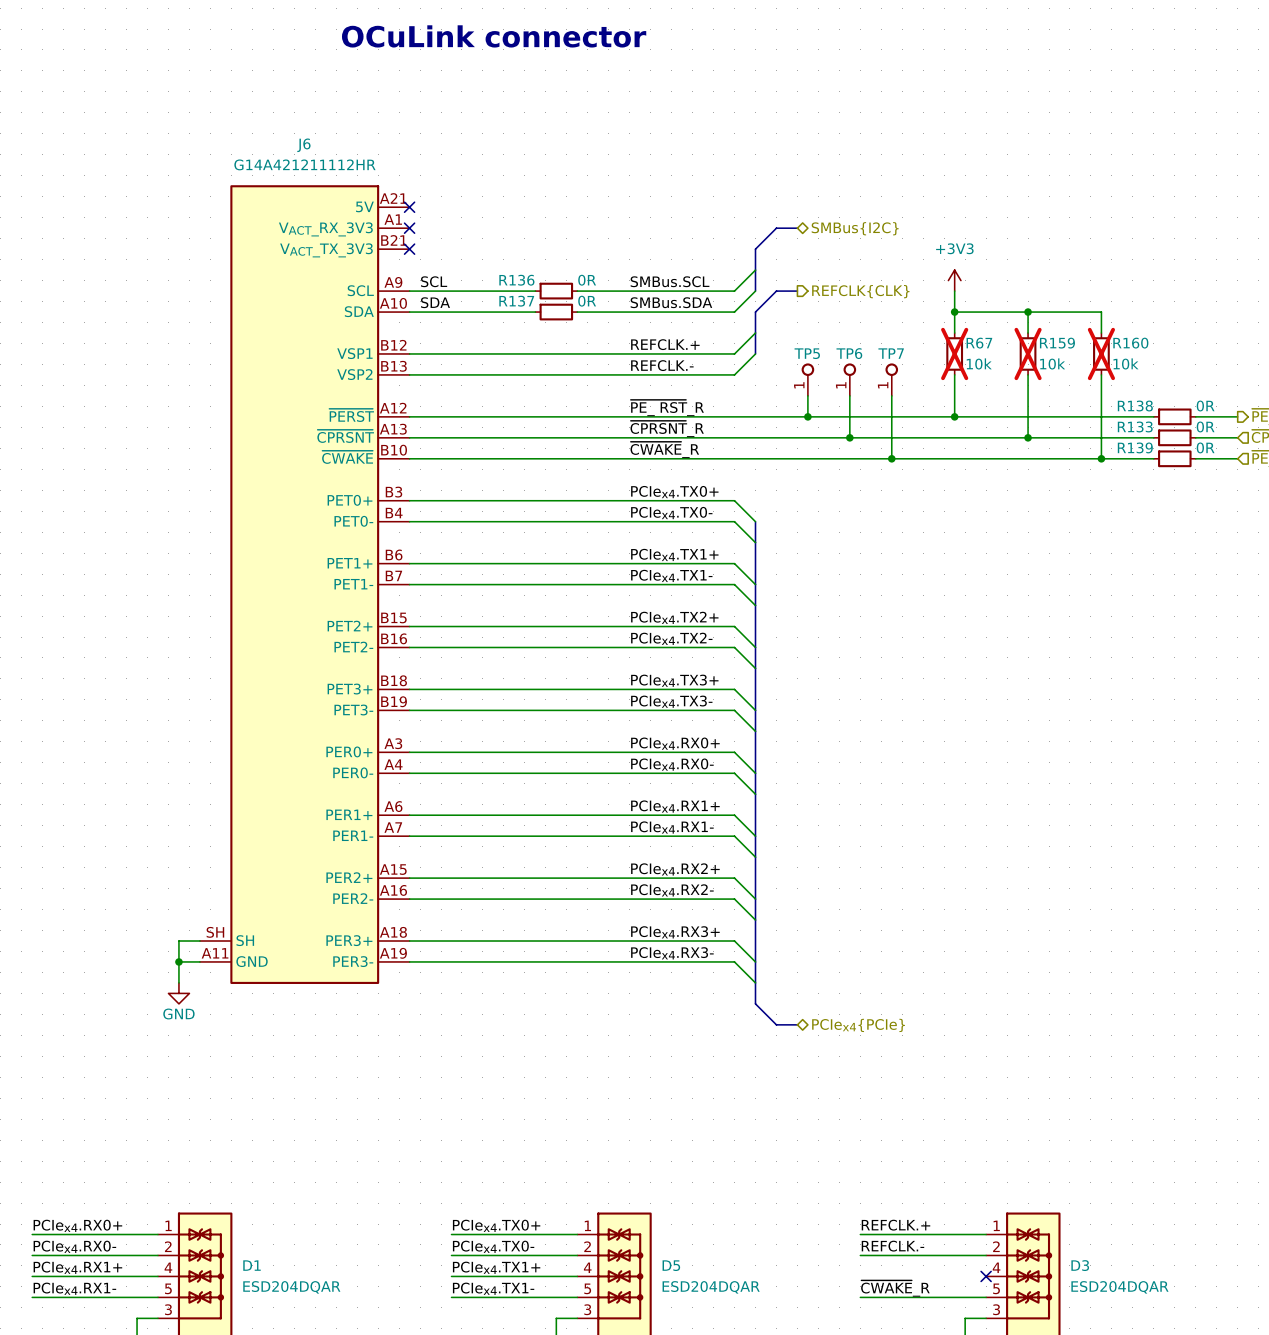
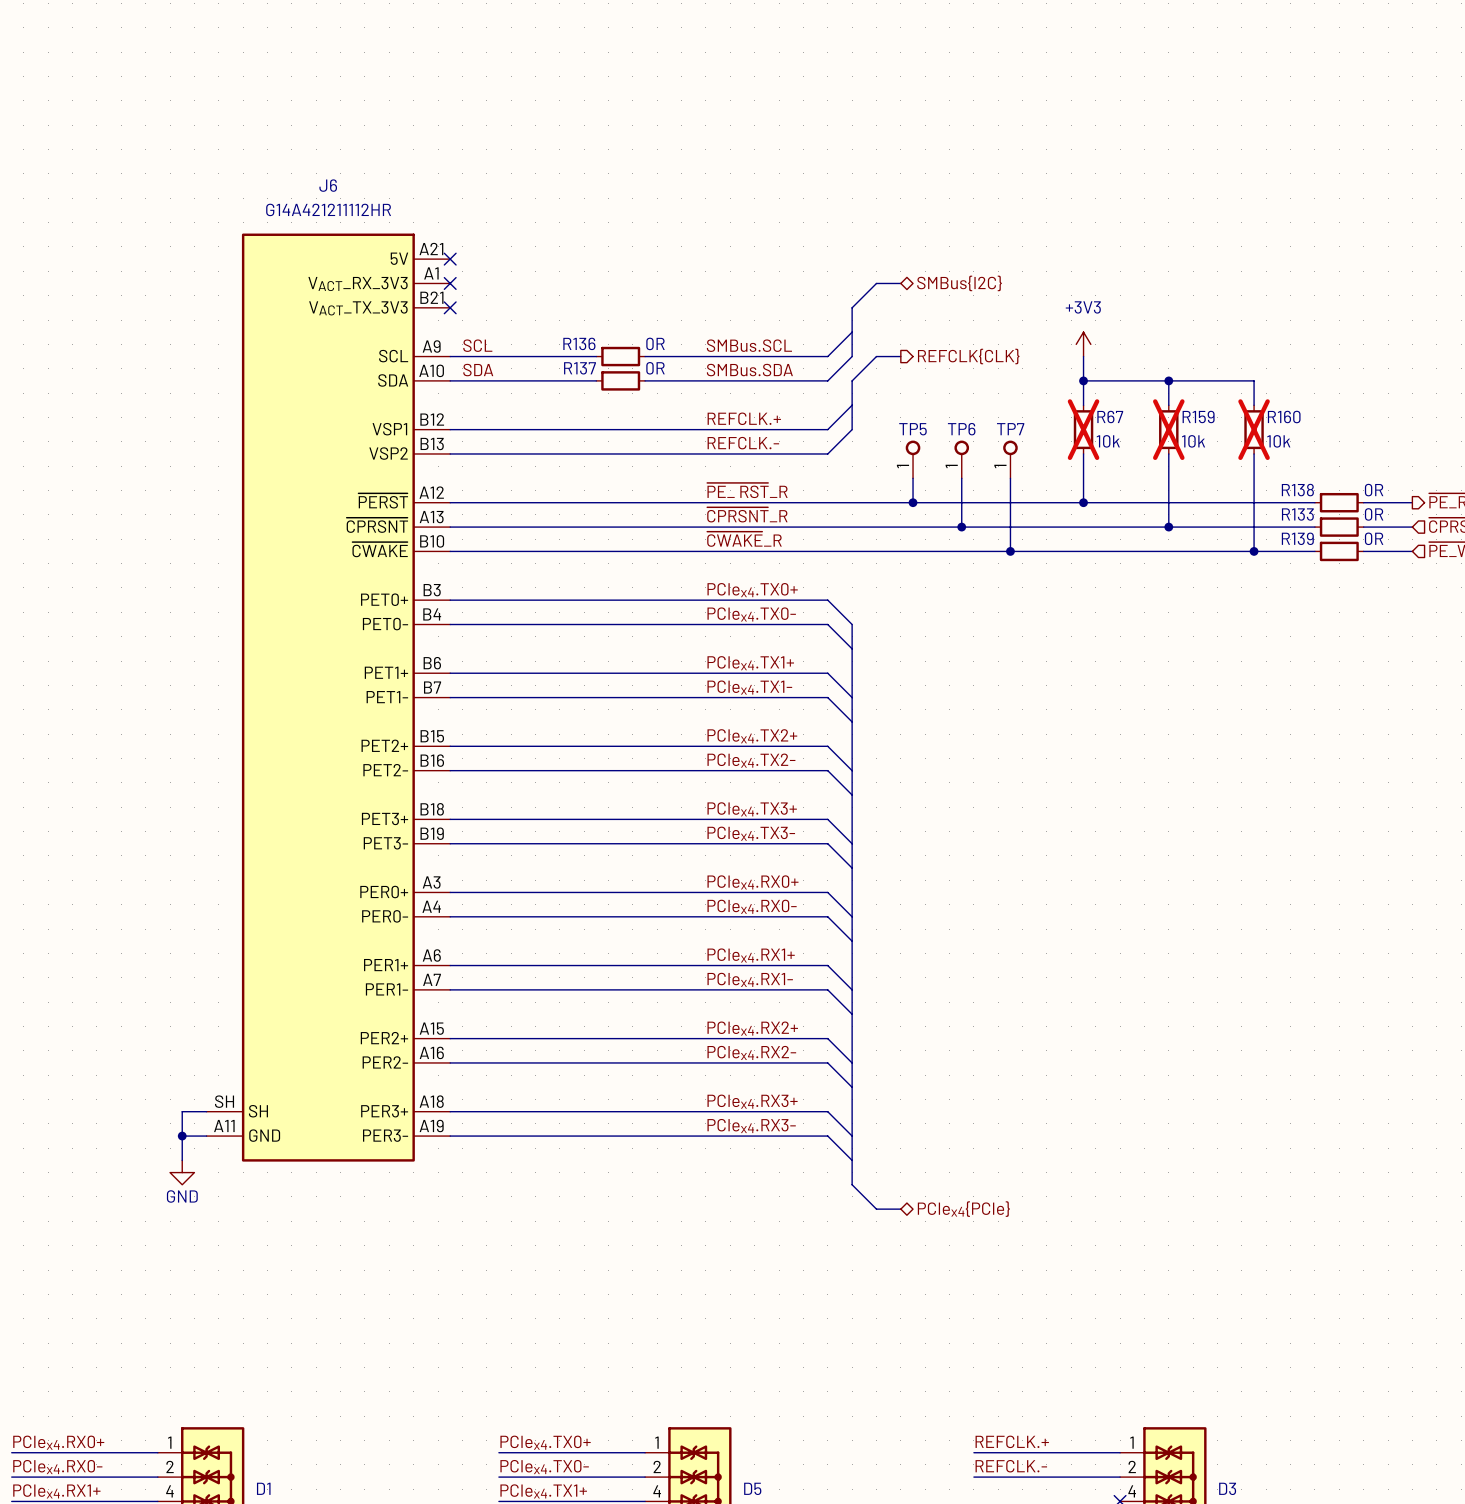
text: OCuLink connector (494, 36) -> none

